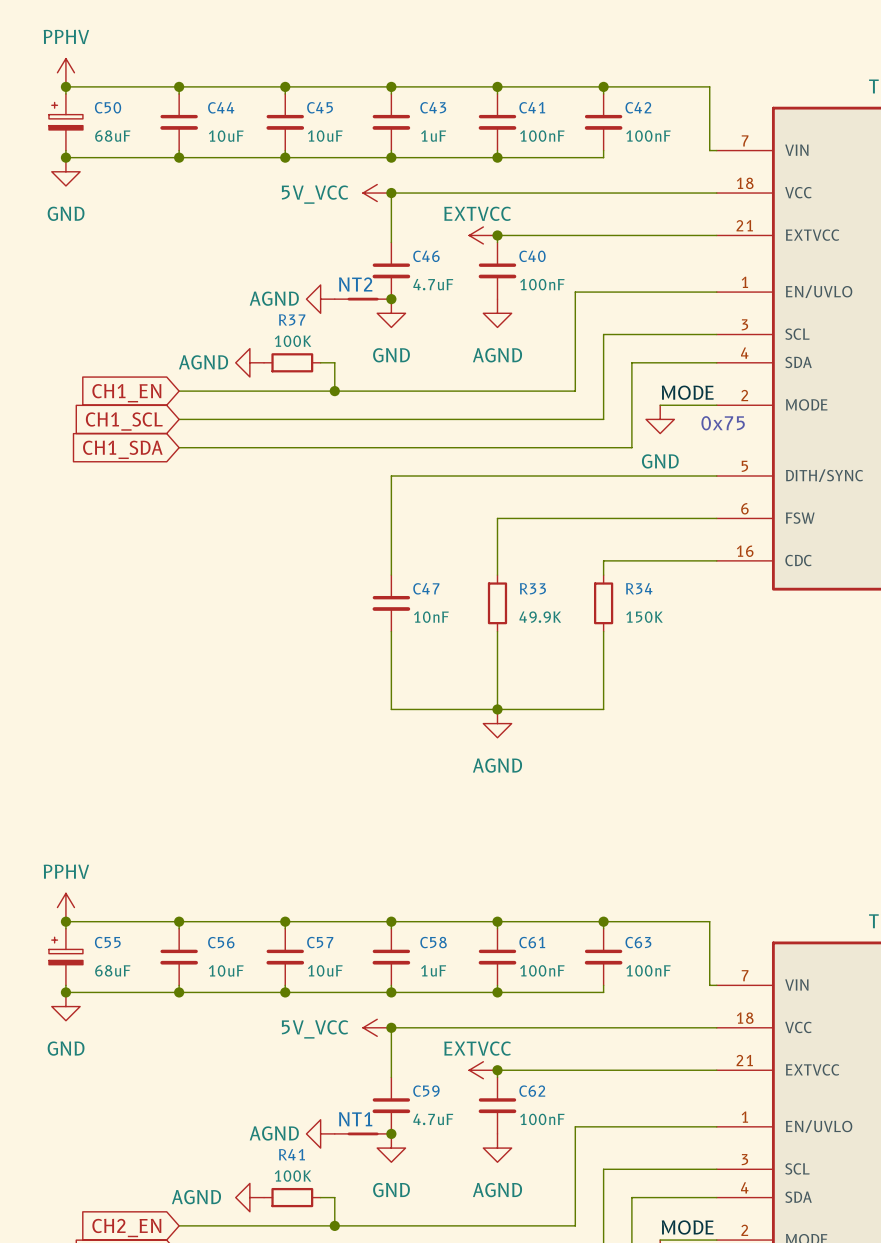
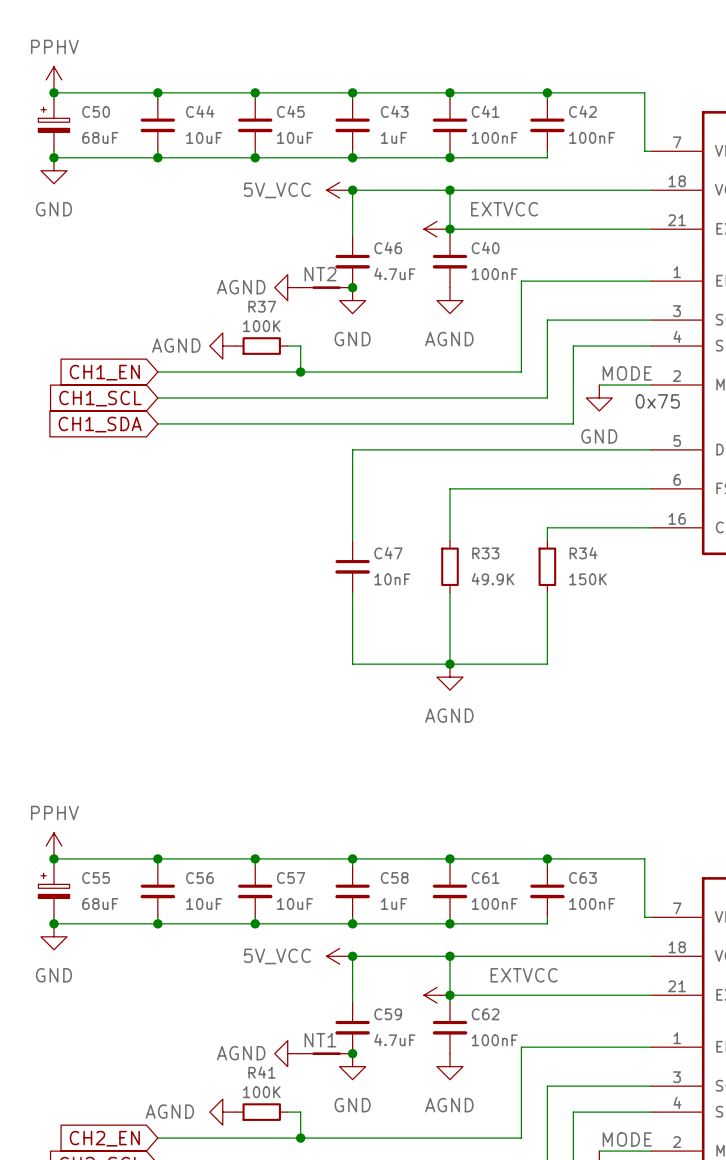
wire: none -> (450, 190) (450, 229)
junction: none -> (450, 190)
power symbol text position: EXTVCC (477, 213) -> EXTVCC (504, 209)
wire: none -> (450, 956) (450, 995)
junction: none -> (450, 956)
power symbol text position: EXTVCC (477, 1048) -> EXTVCC (524, 975)

